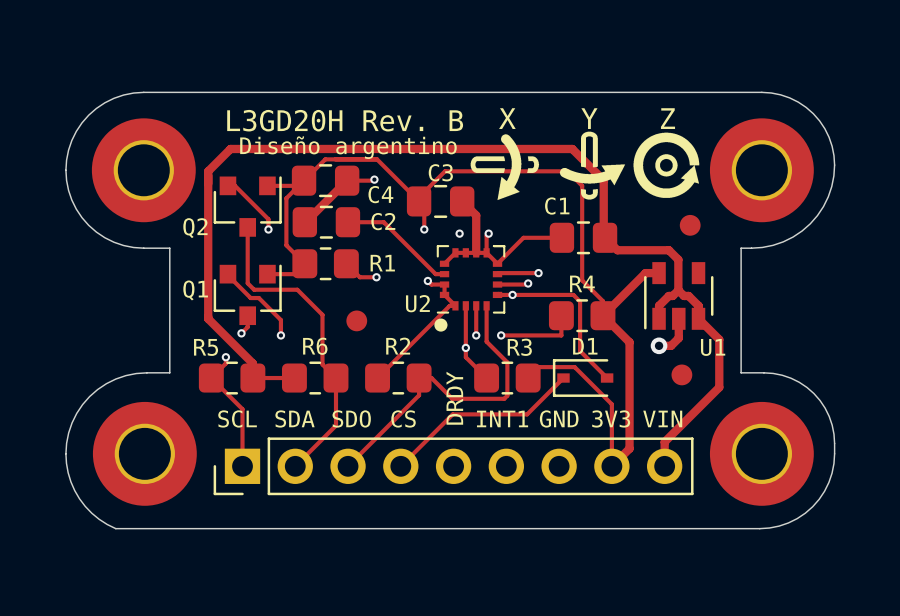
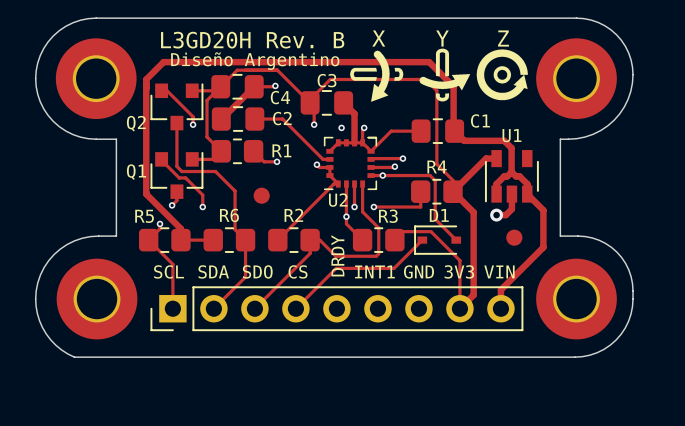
text: Diseño argentino (348, 147) -> Diseño Argentino (255, 61)
C1 name position: C1 (557, 206) -> C1 (480, 120)
part: (690, 225) -> none
U2 name position: U2 (417, 303) -> U2 (338, 200)
drawing: [434, 318, 448, 332] -> none
U1 name position: U1 (713, 347) -> U1 (511, 135)

